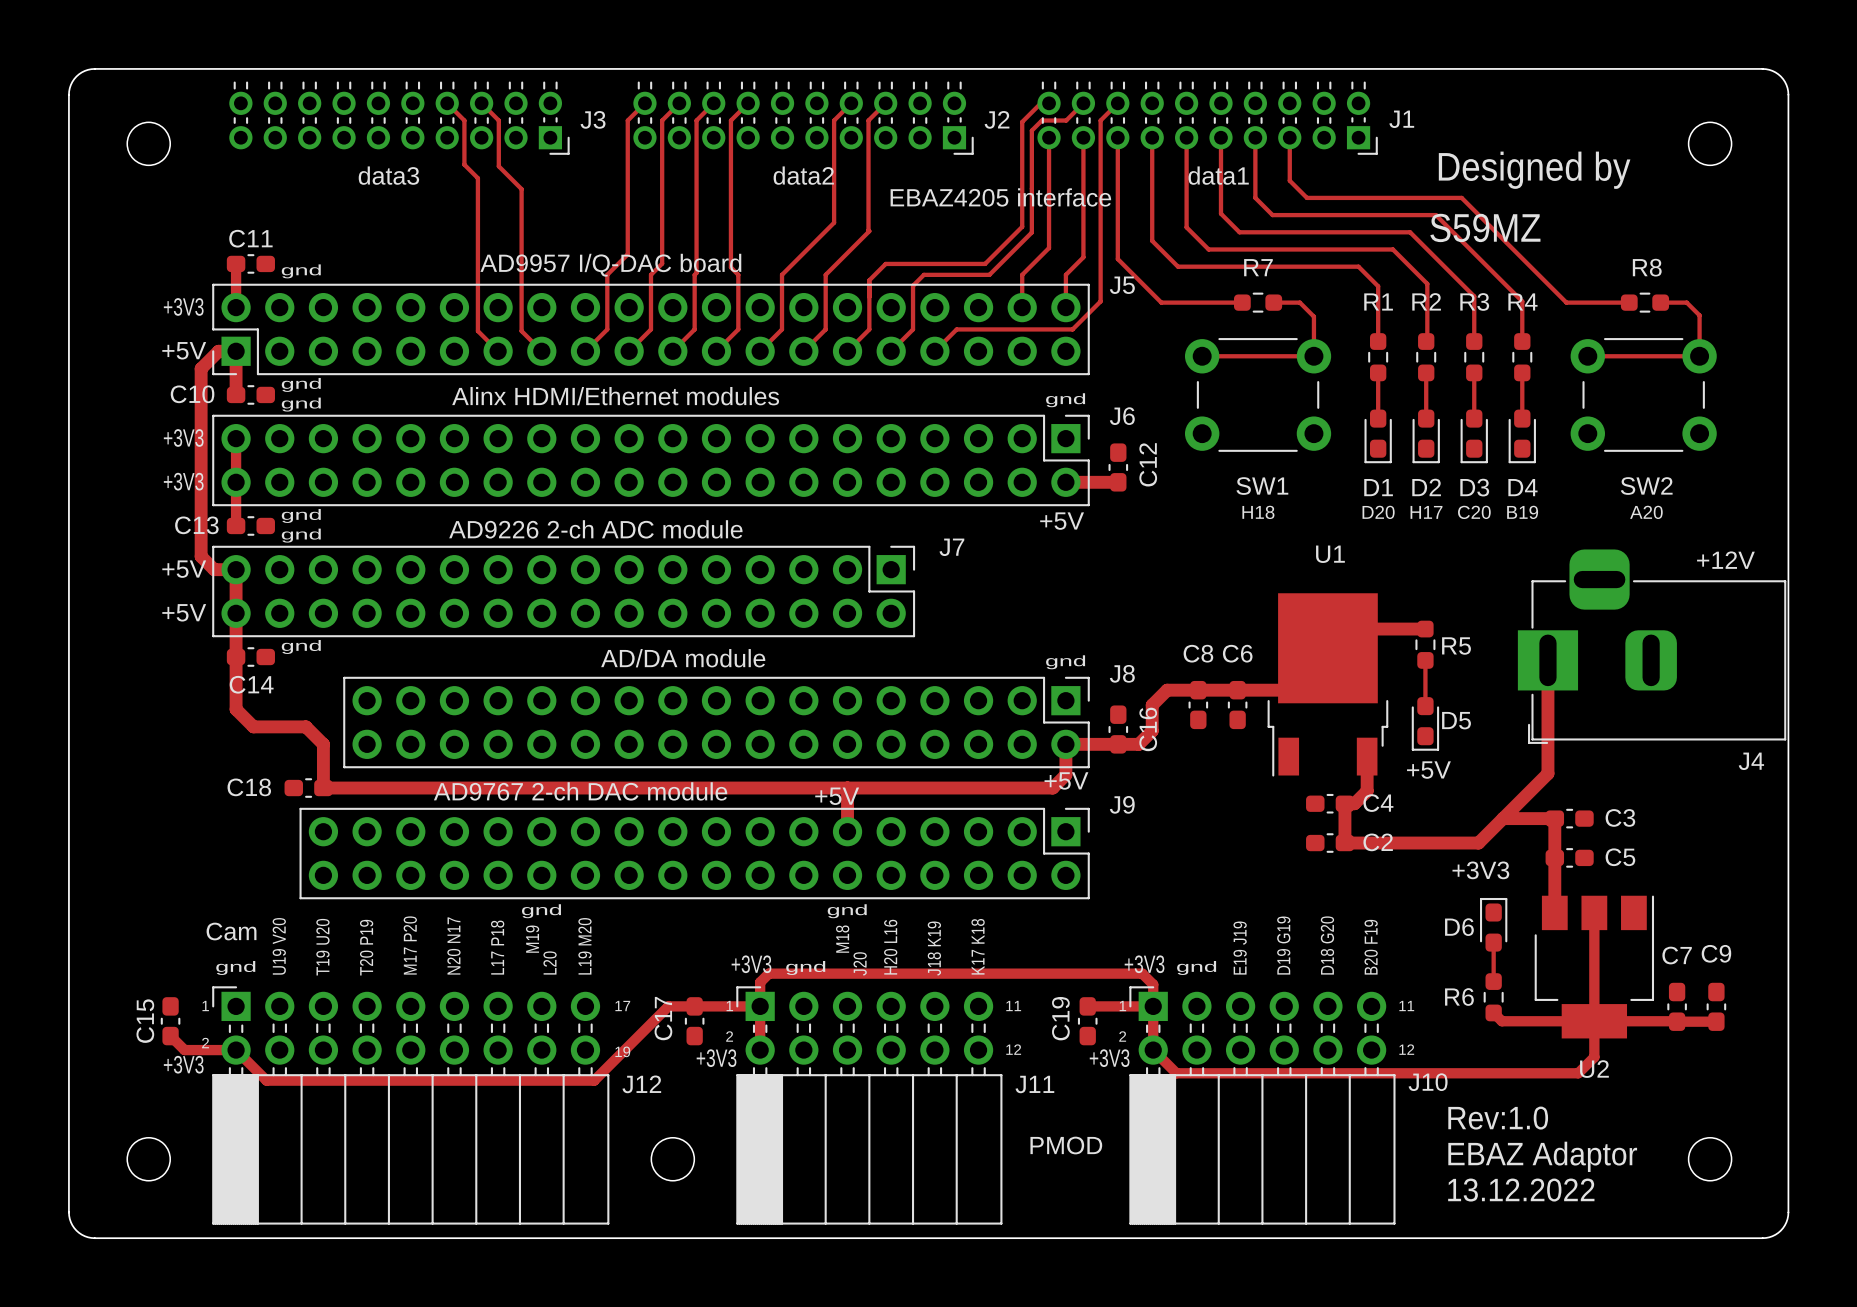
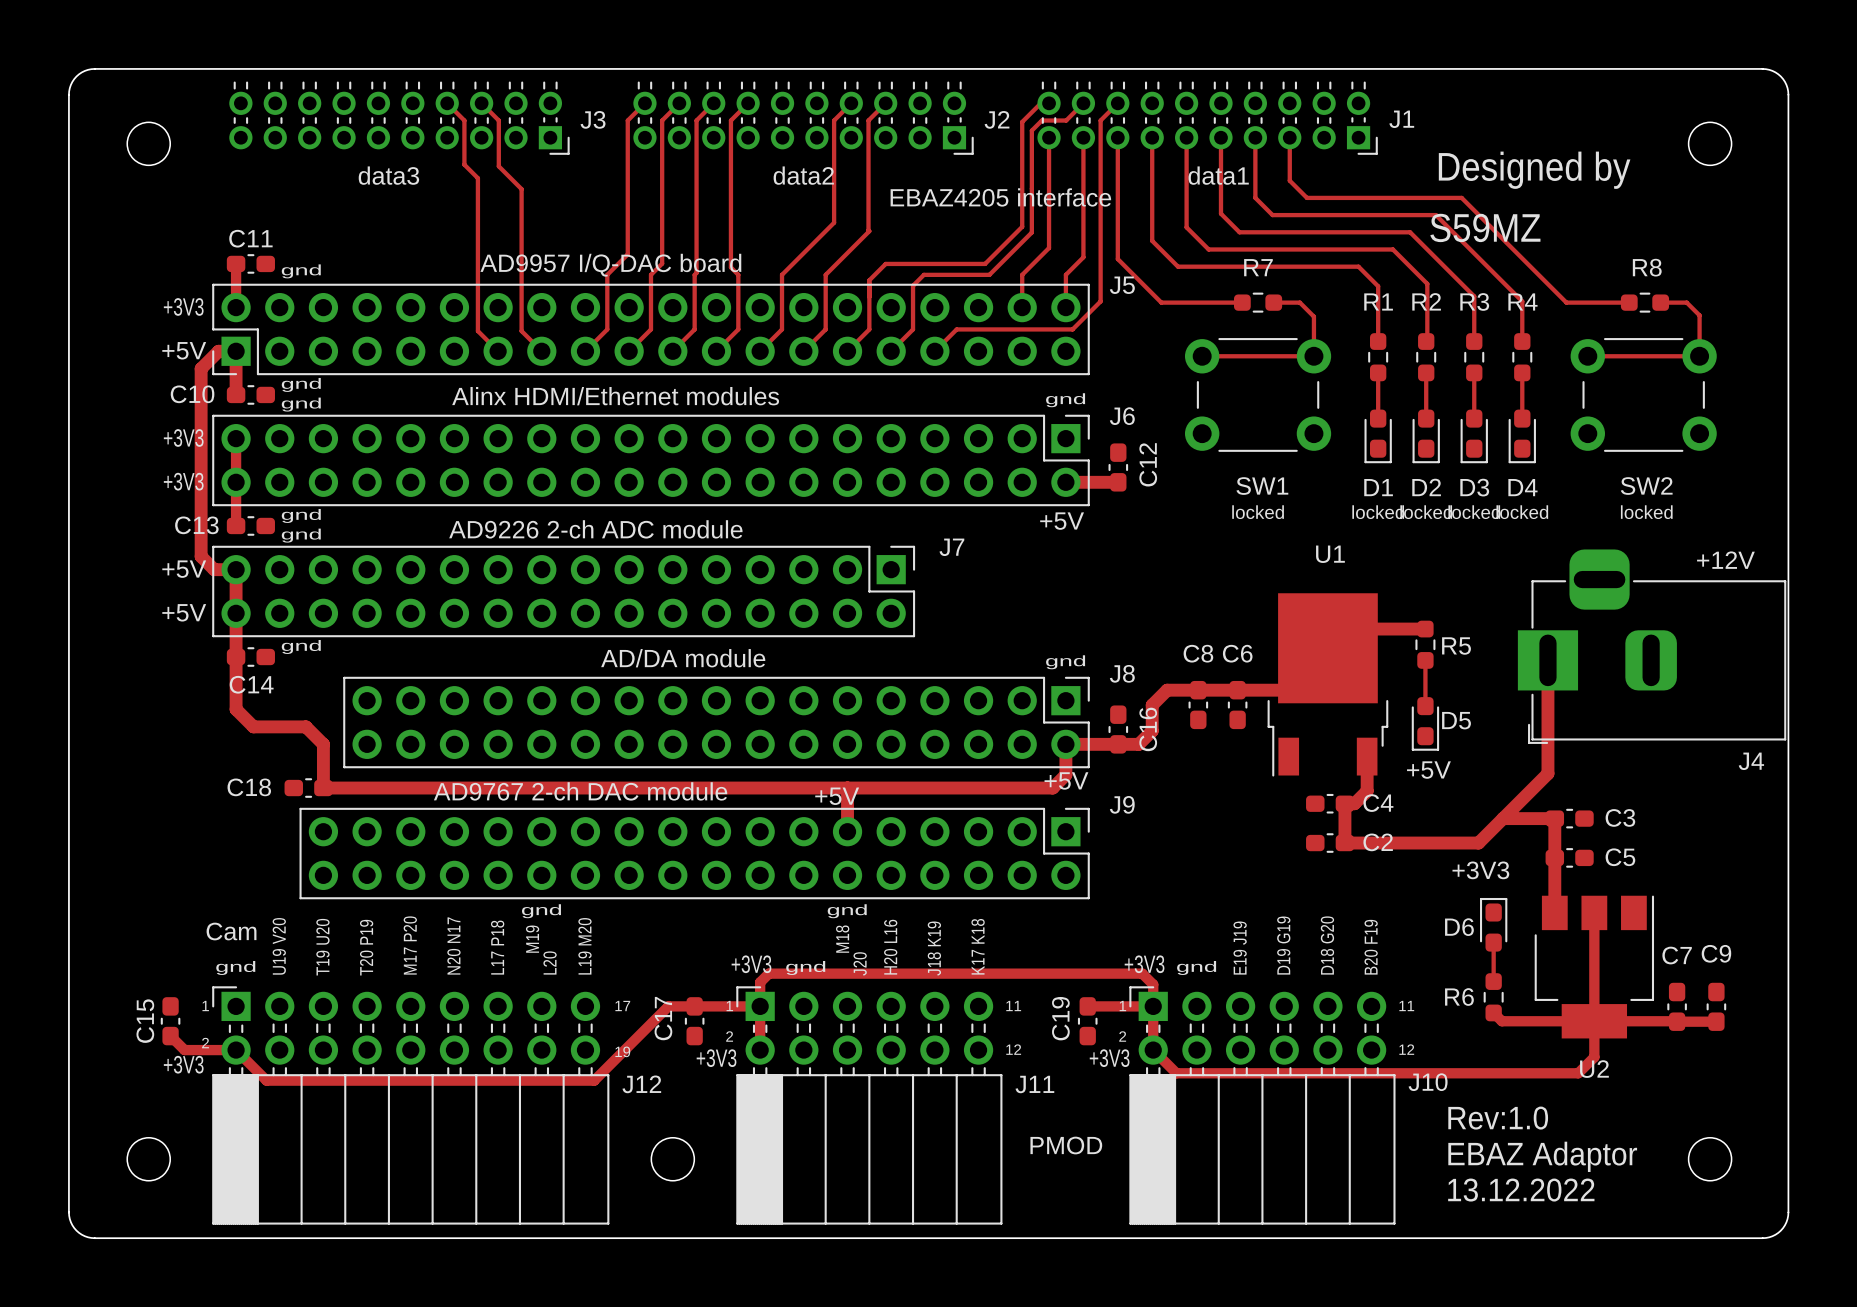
text: H18 (1258, 512) -> locked (1258, 512)
text: D20 (1378, 512) -> locked (1378, 512)
text: H17 (1426, 512) -> locked (1426, 512)
text: C20 (1474, 512) -> locked (1474, 512)
text: B19 (1522, 512) -> locked (1522, 512)
text: A20 (1646, 512) -> locked (1646, 512)

